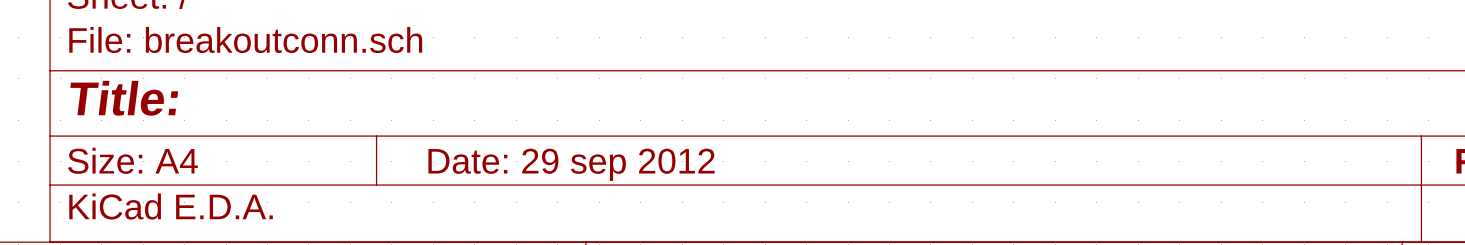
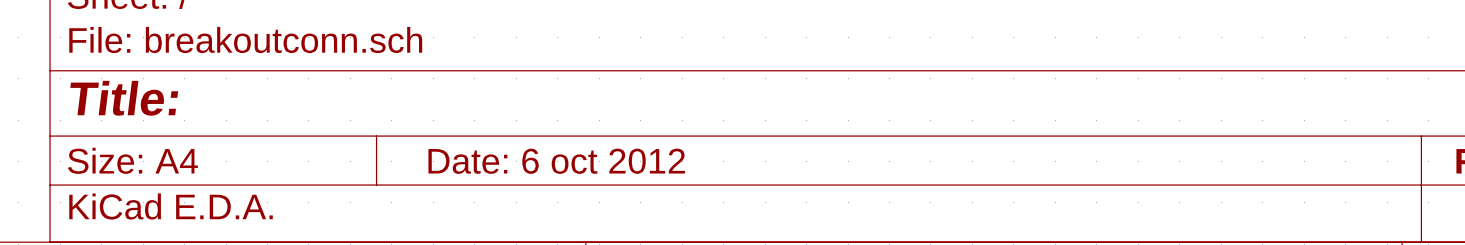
title block: Date: 29 sep 2012 (571, 164) -> Date: 6 oct 2012 (556, 161)

